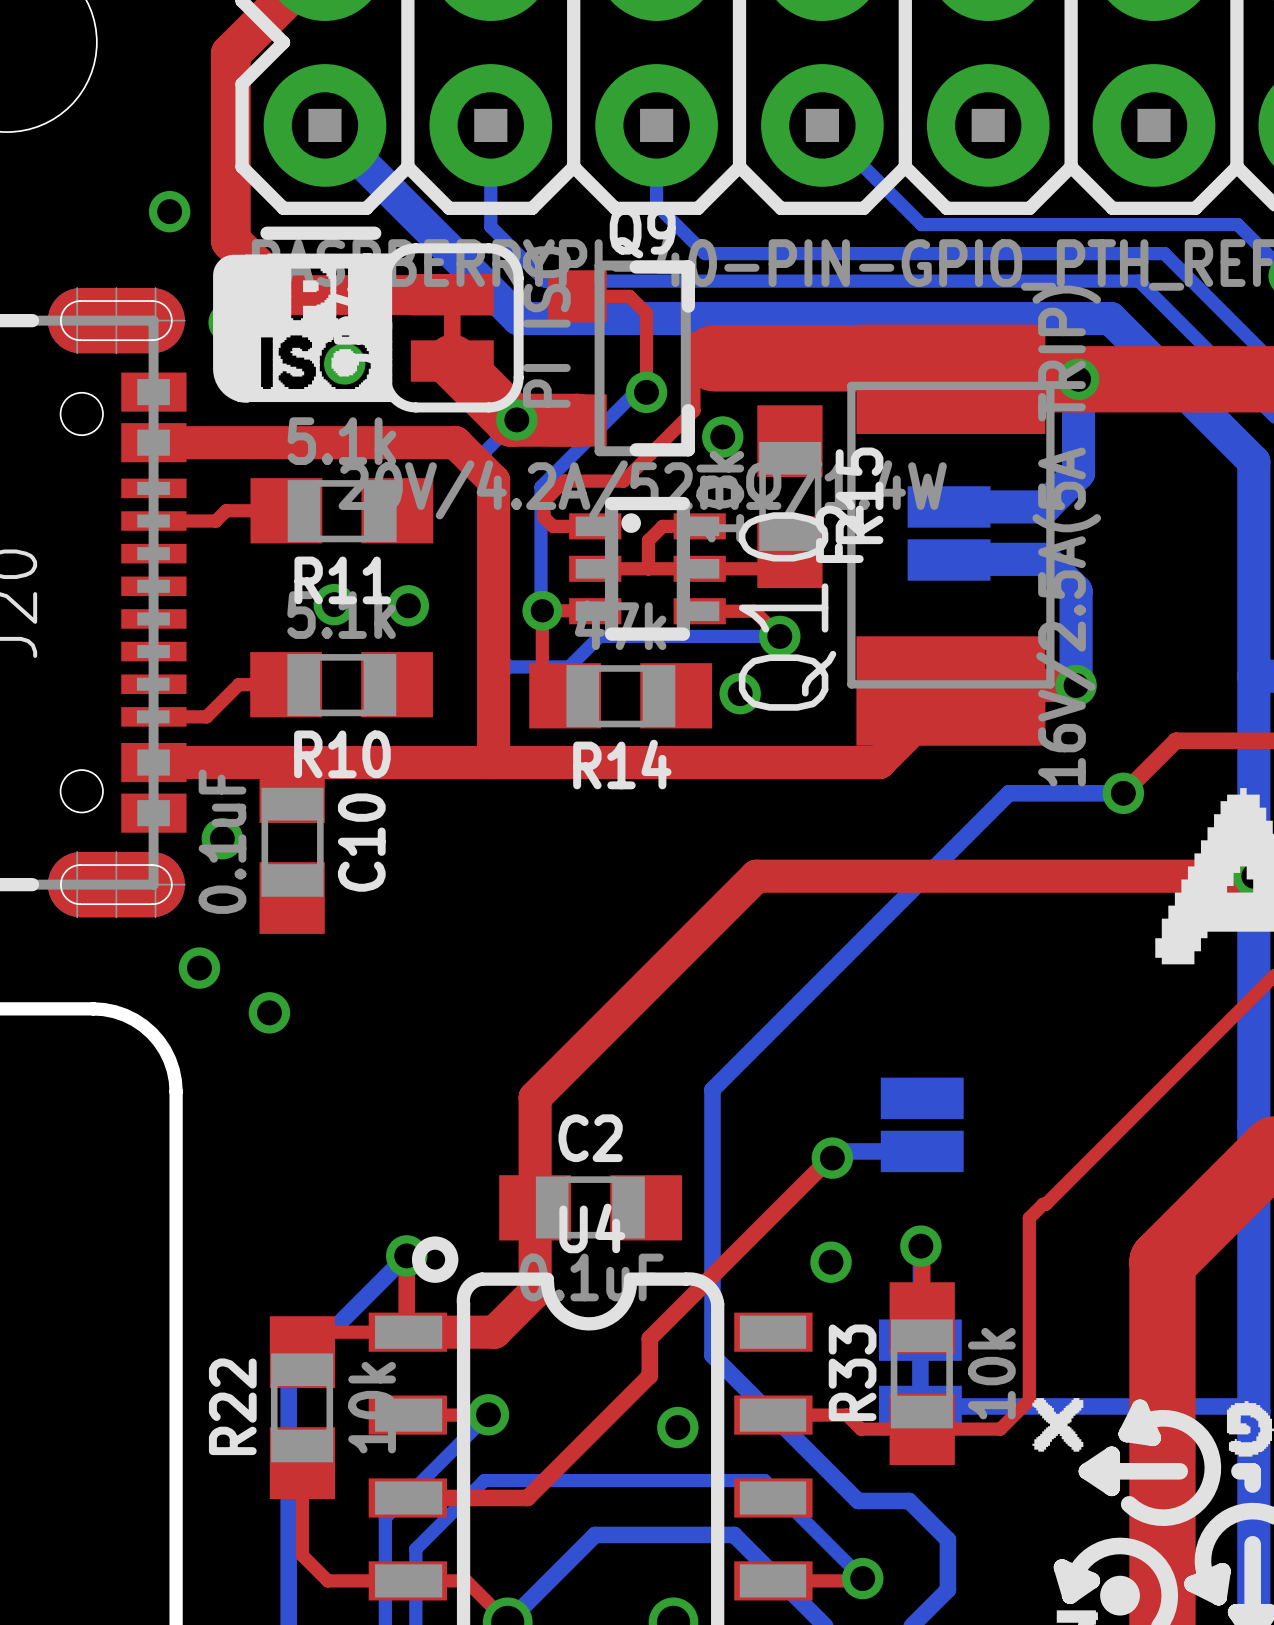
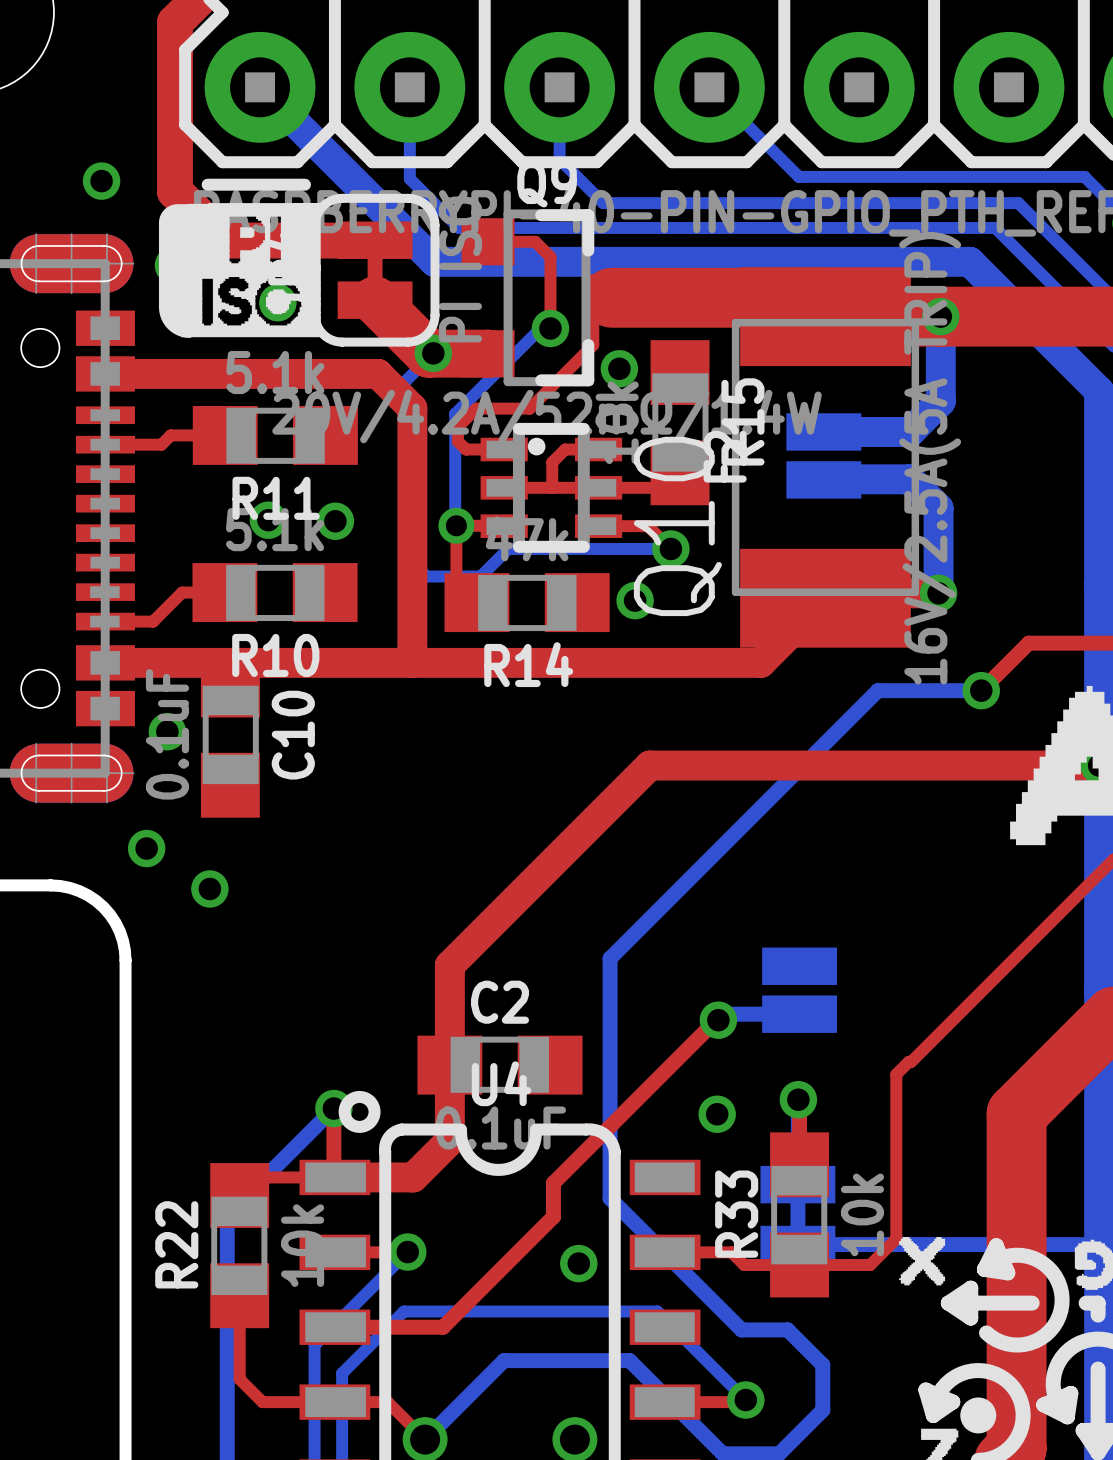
via position: (169, 211) -> (101, 181)

